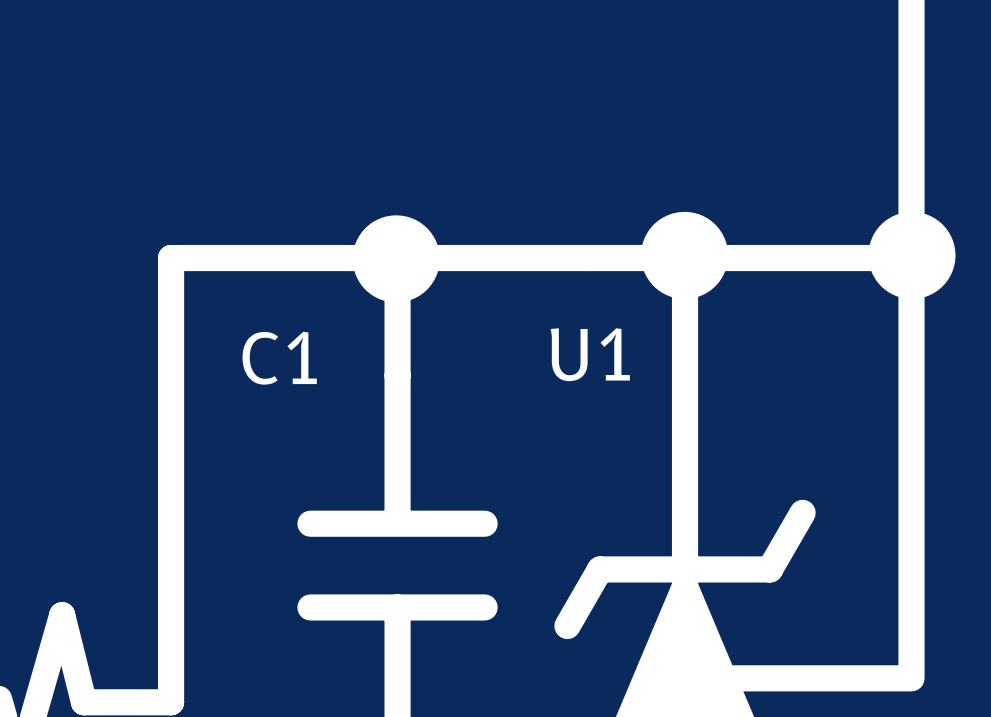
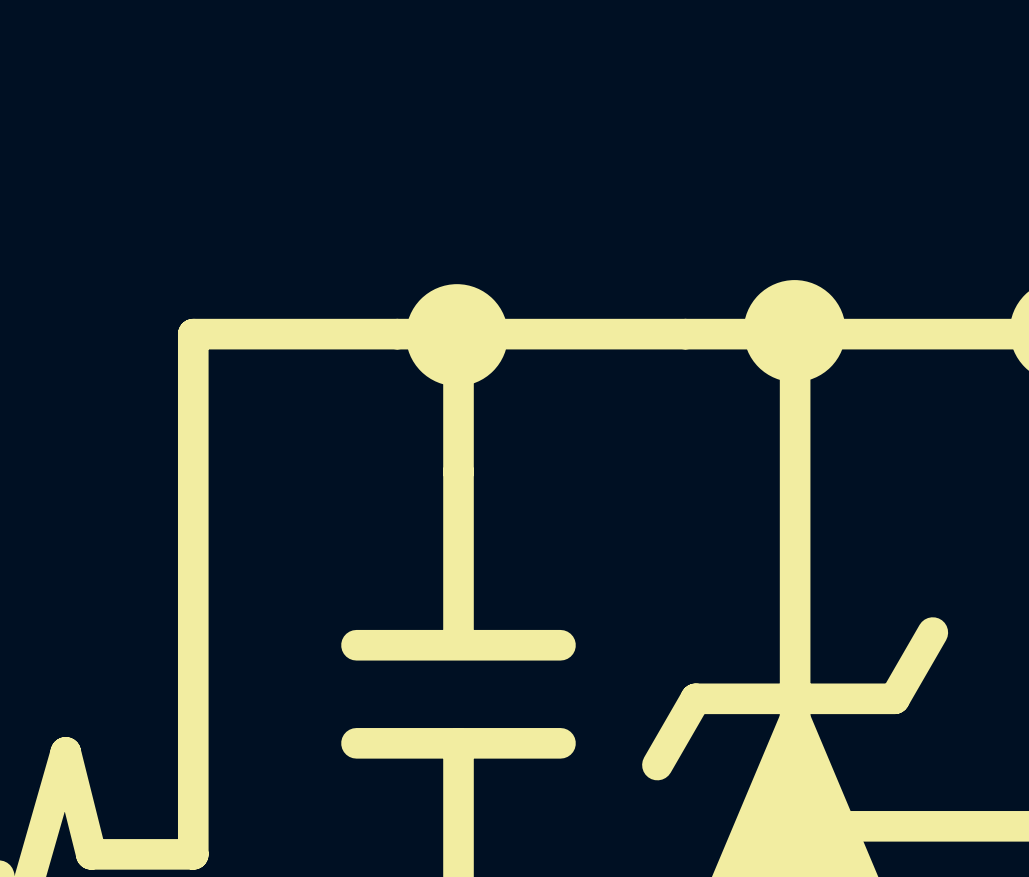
text: U1 (590, 354) -> none
text: C1 (279, 358) -> none

